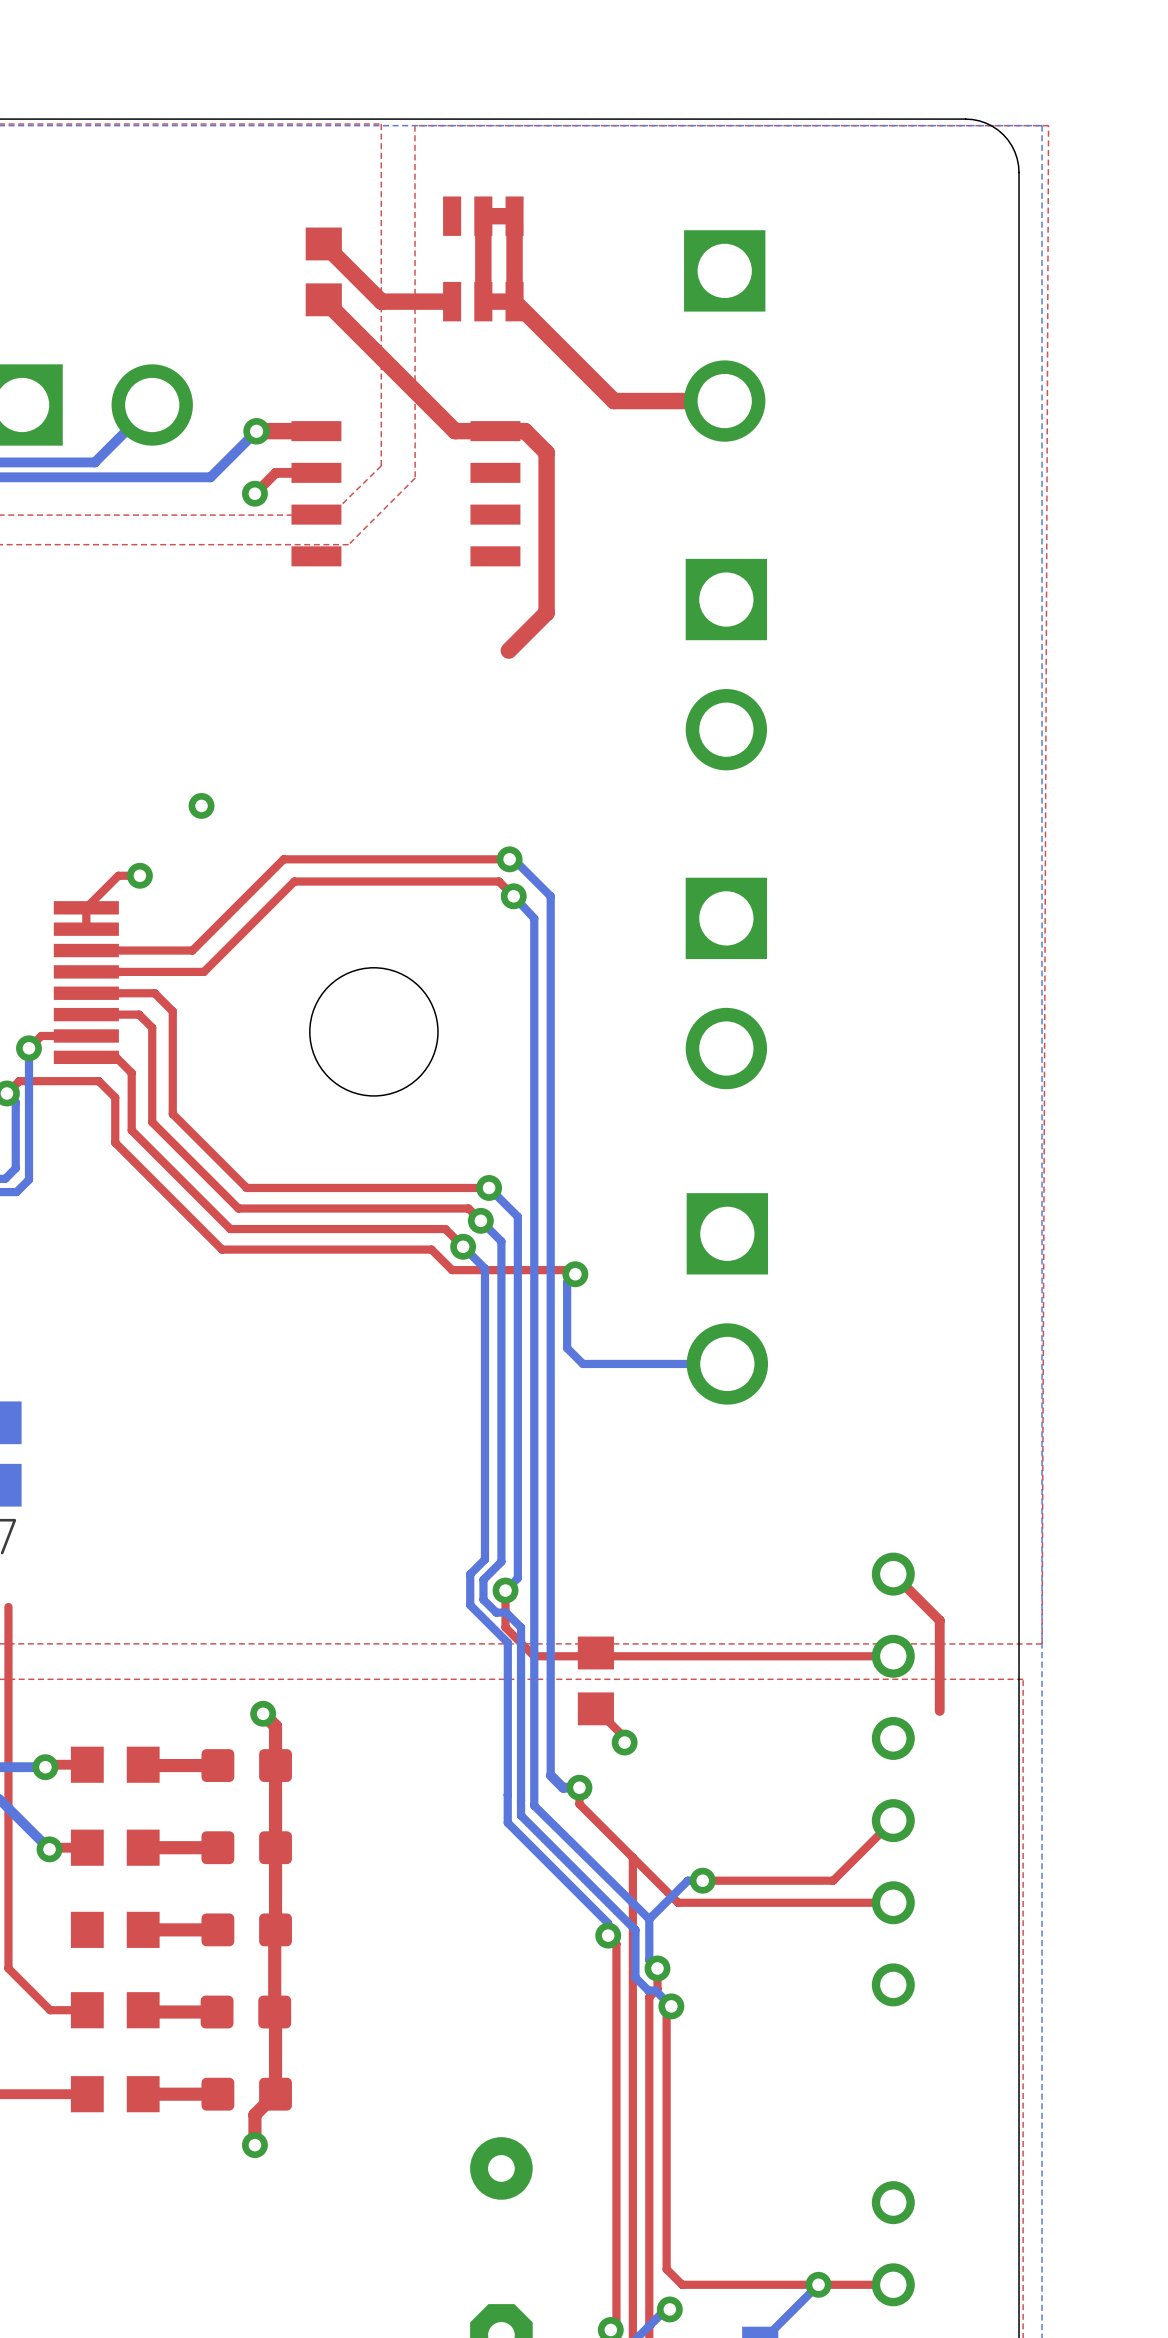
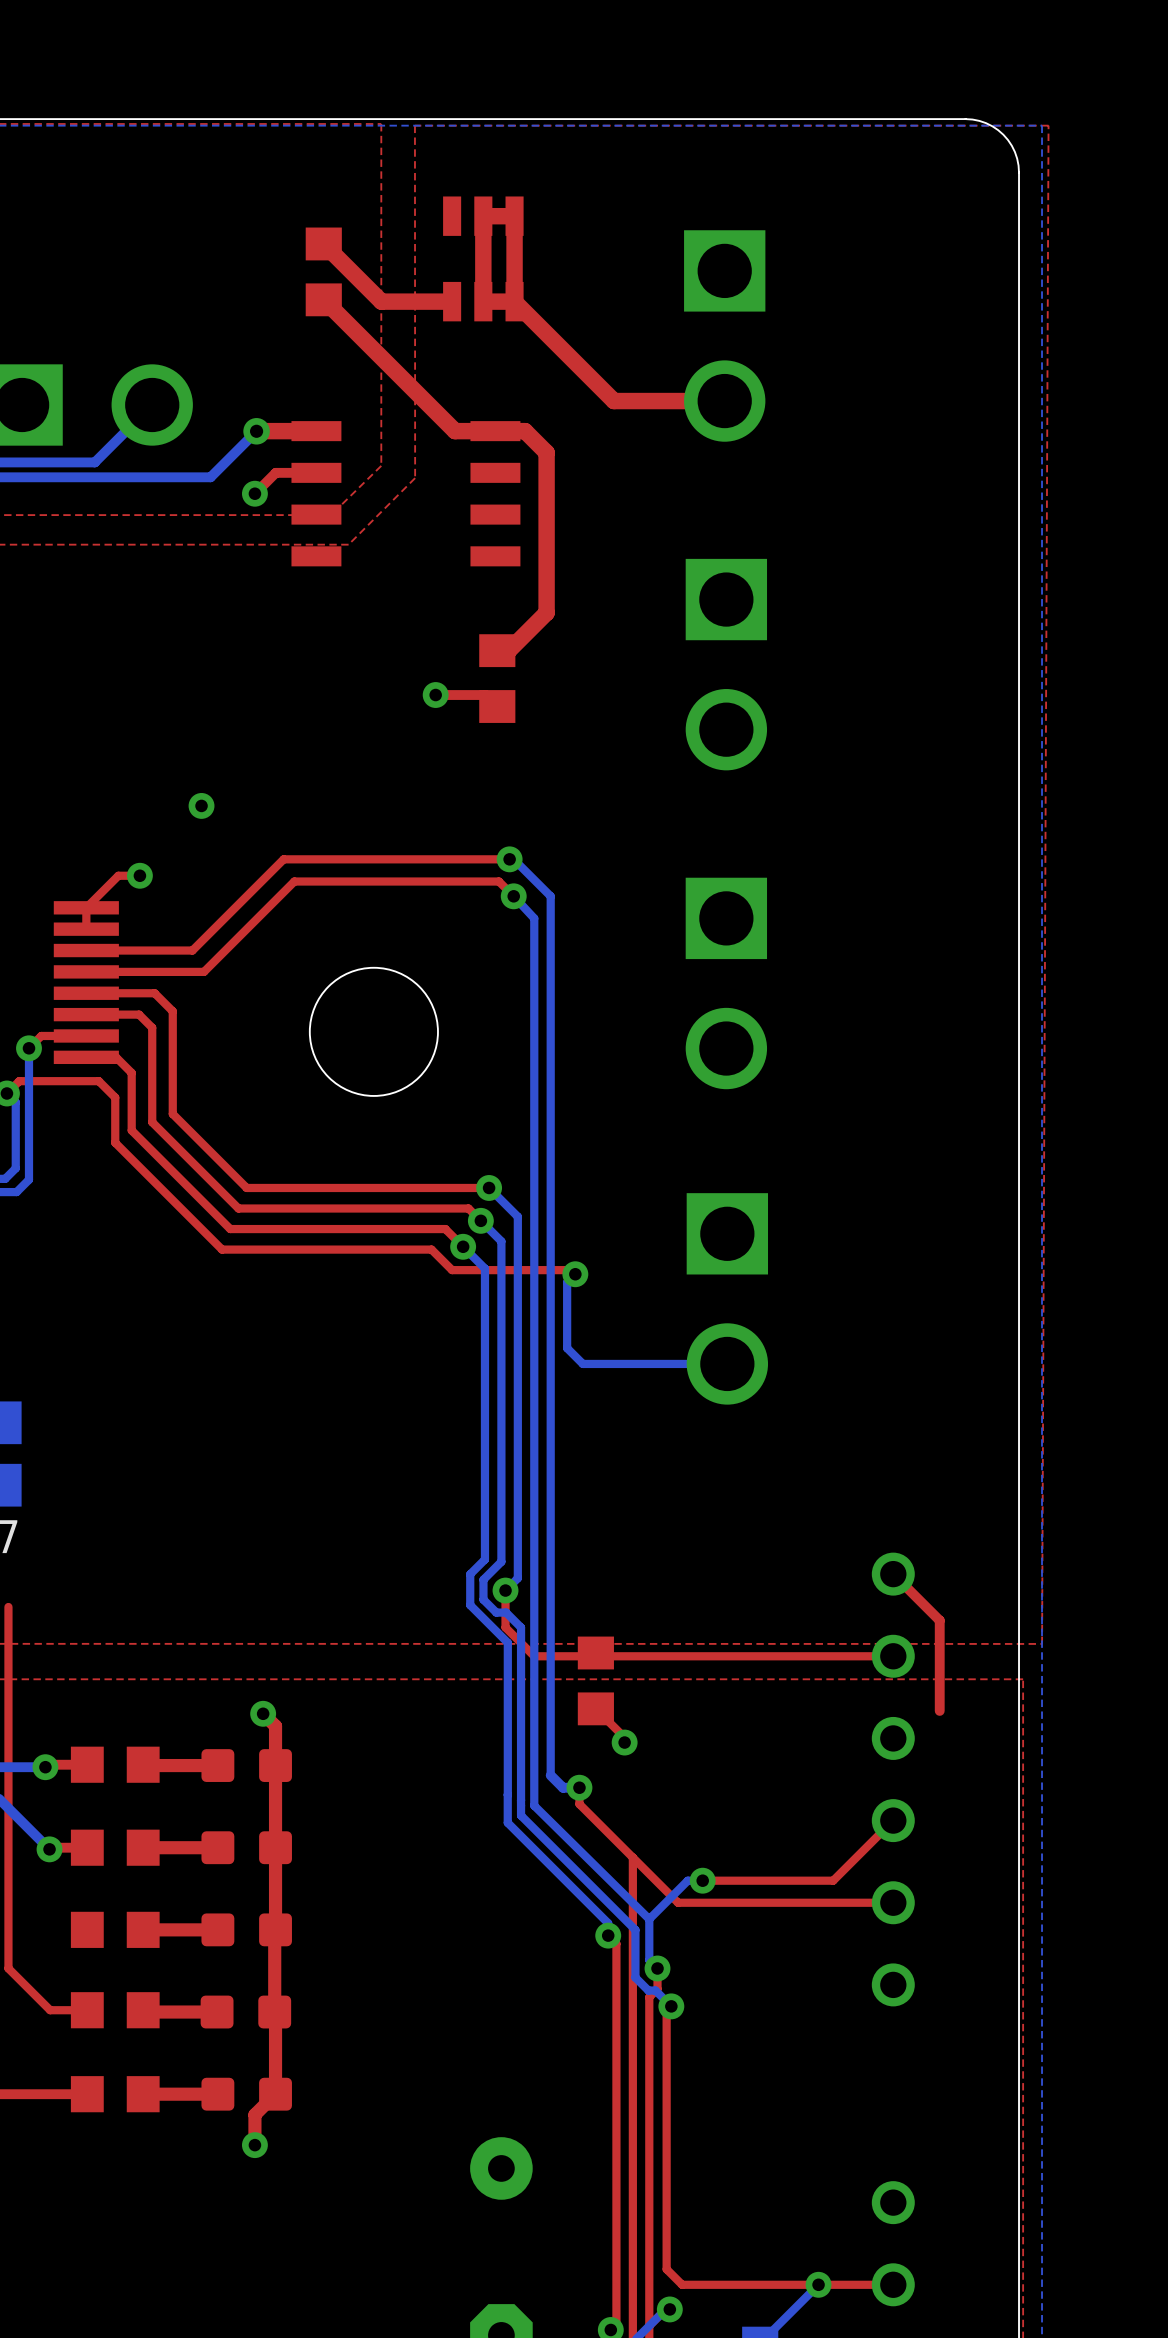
part: none -> (497, 678)
top track: none -> (435, 695) (485, 695) (497, 706)
via: none -> (435, 695)

